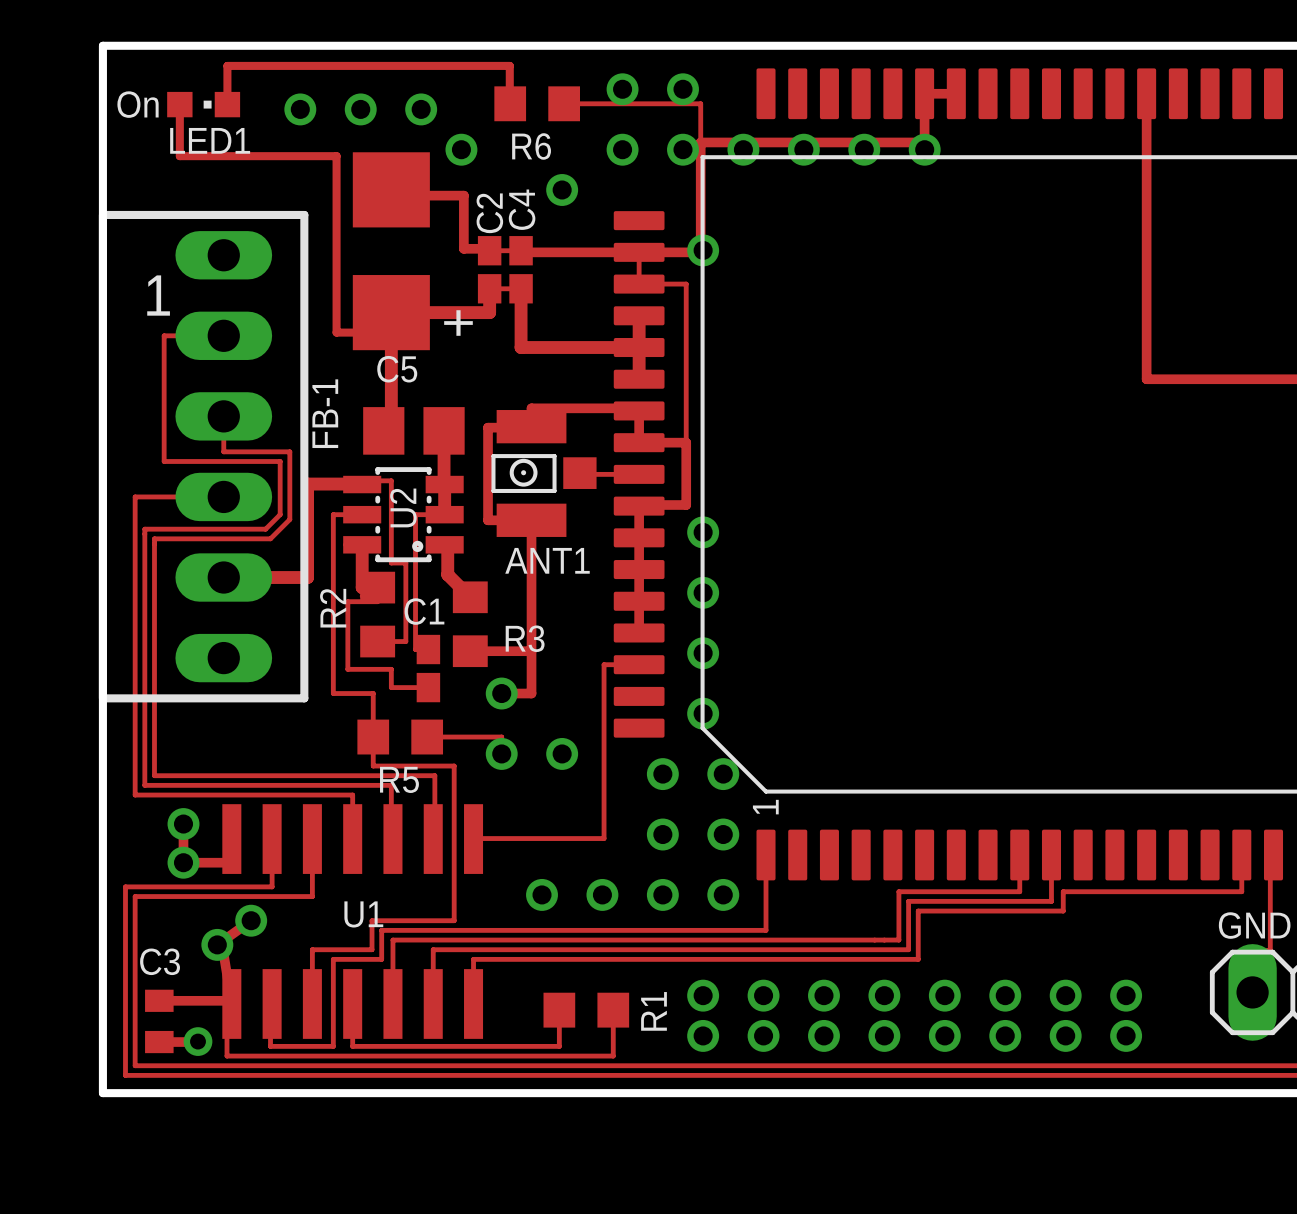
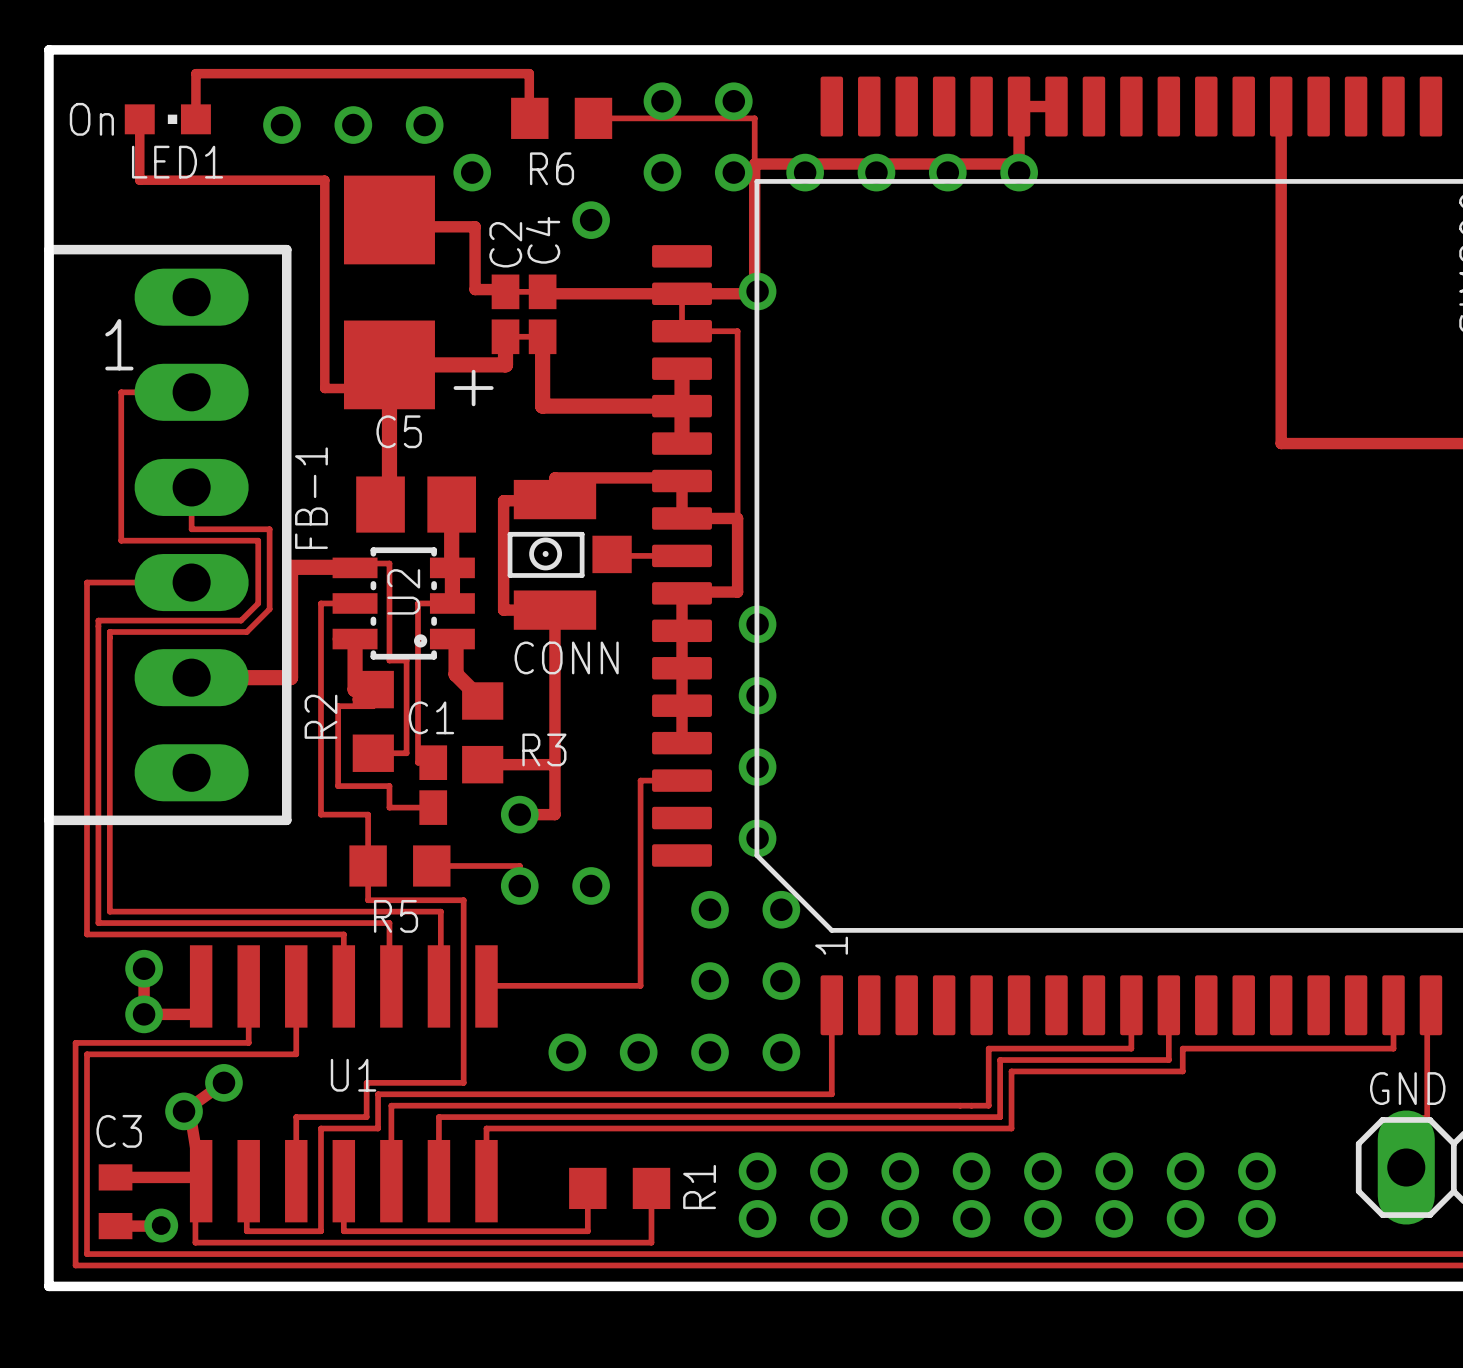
ANT1 name: ANT1 (547, 560) -> CONN (566, 657)

